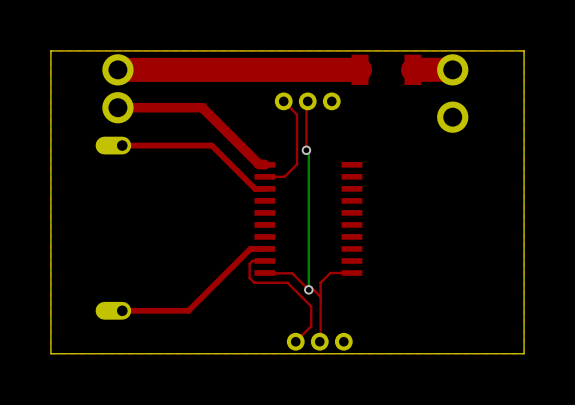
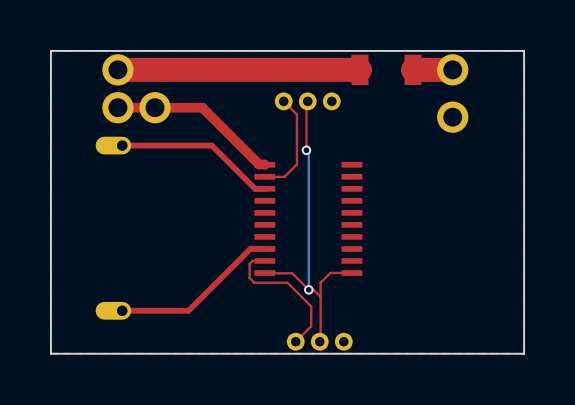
part: none -> (155, 107)

